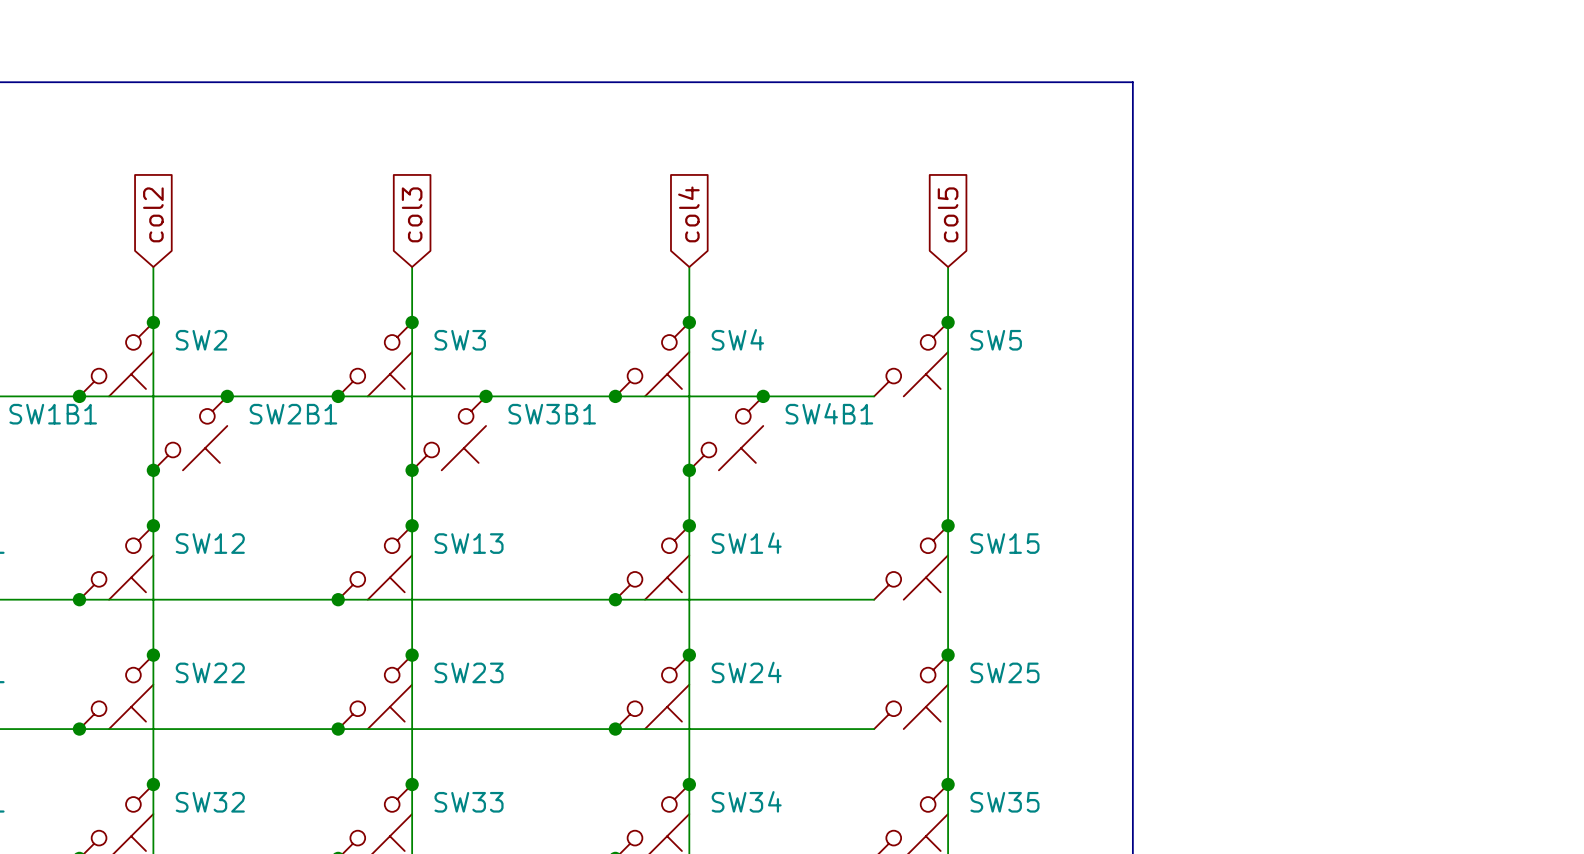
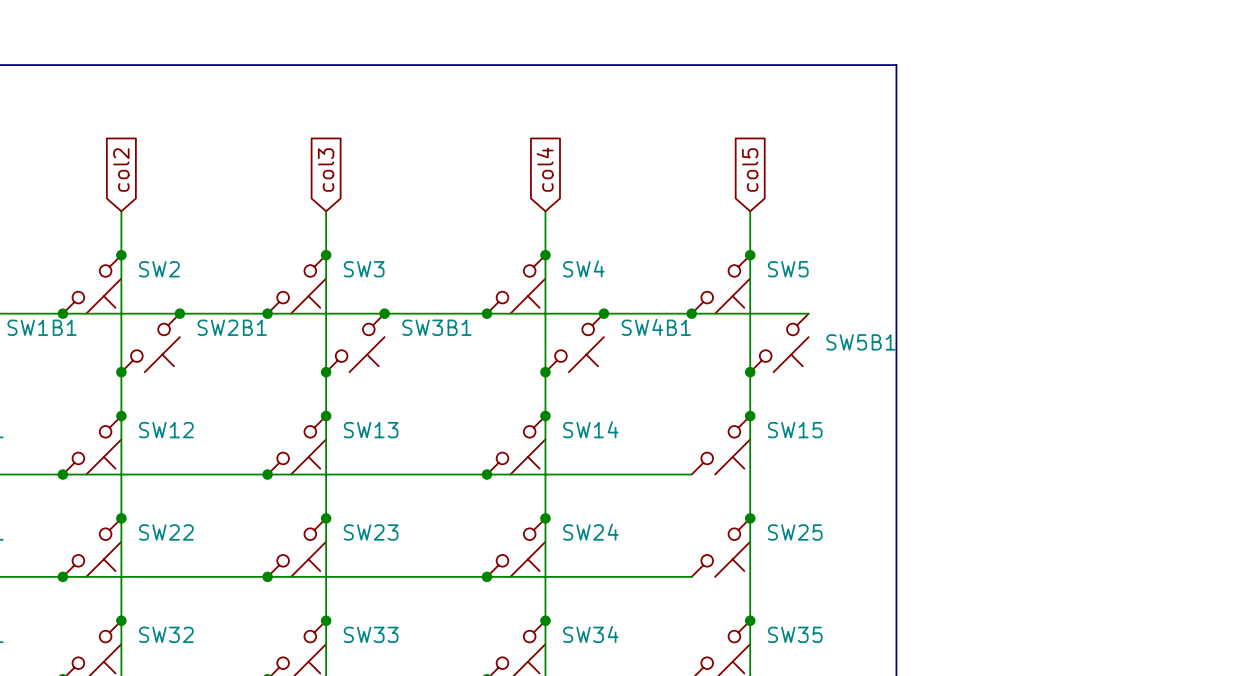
wire: none -> (691, 313) (808, 313)
junction: none -> (691, 313)
SW5B1: none -> (779, 342)
junction: none -> (750, 372)

